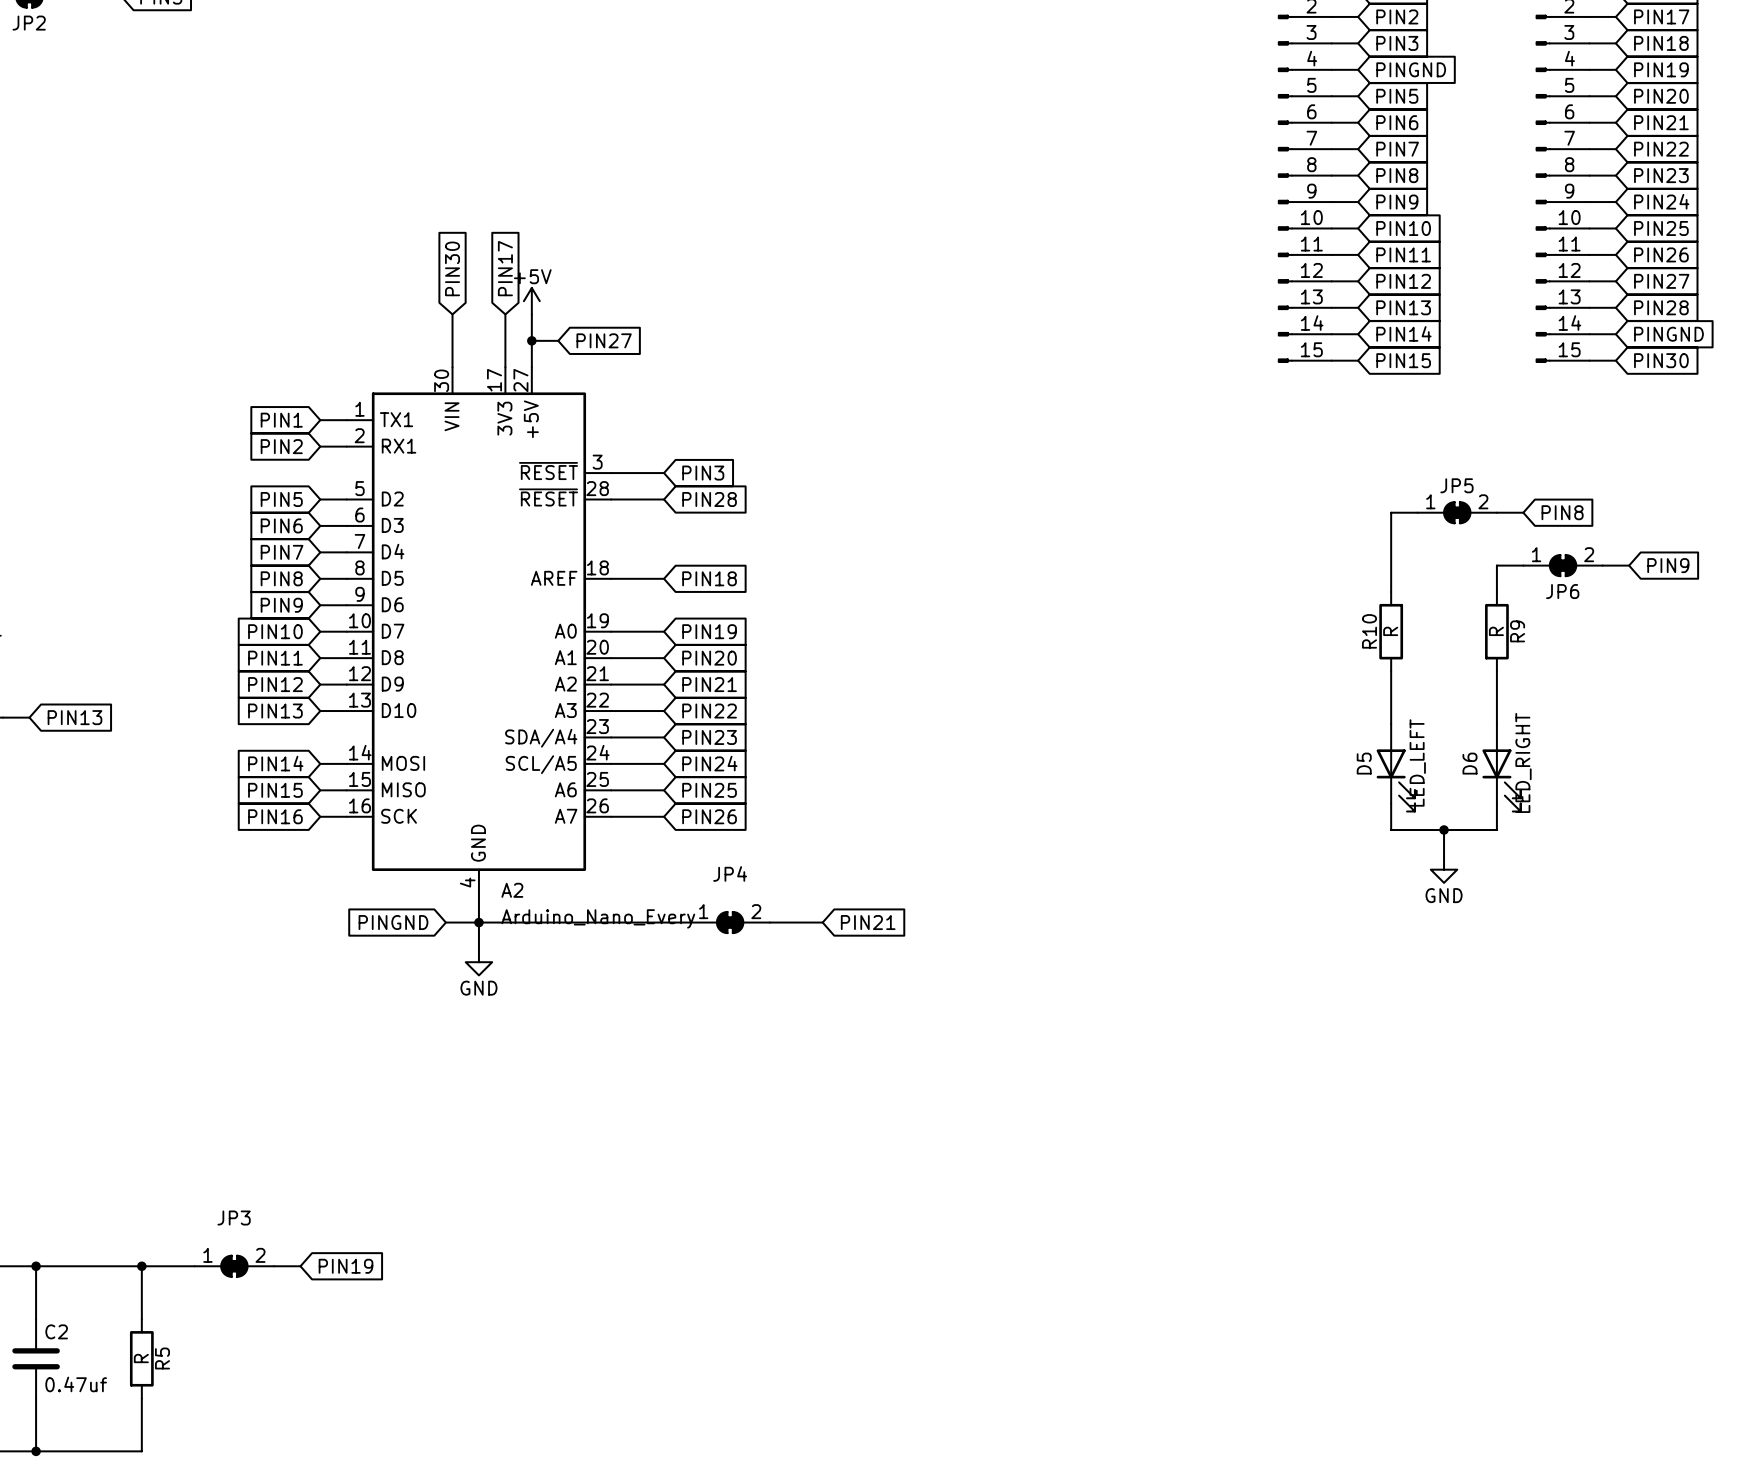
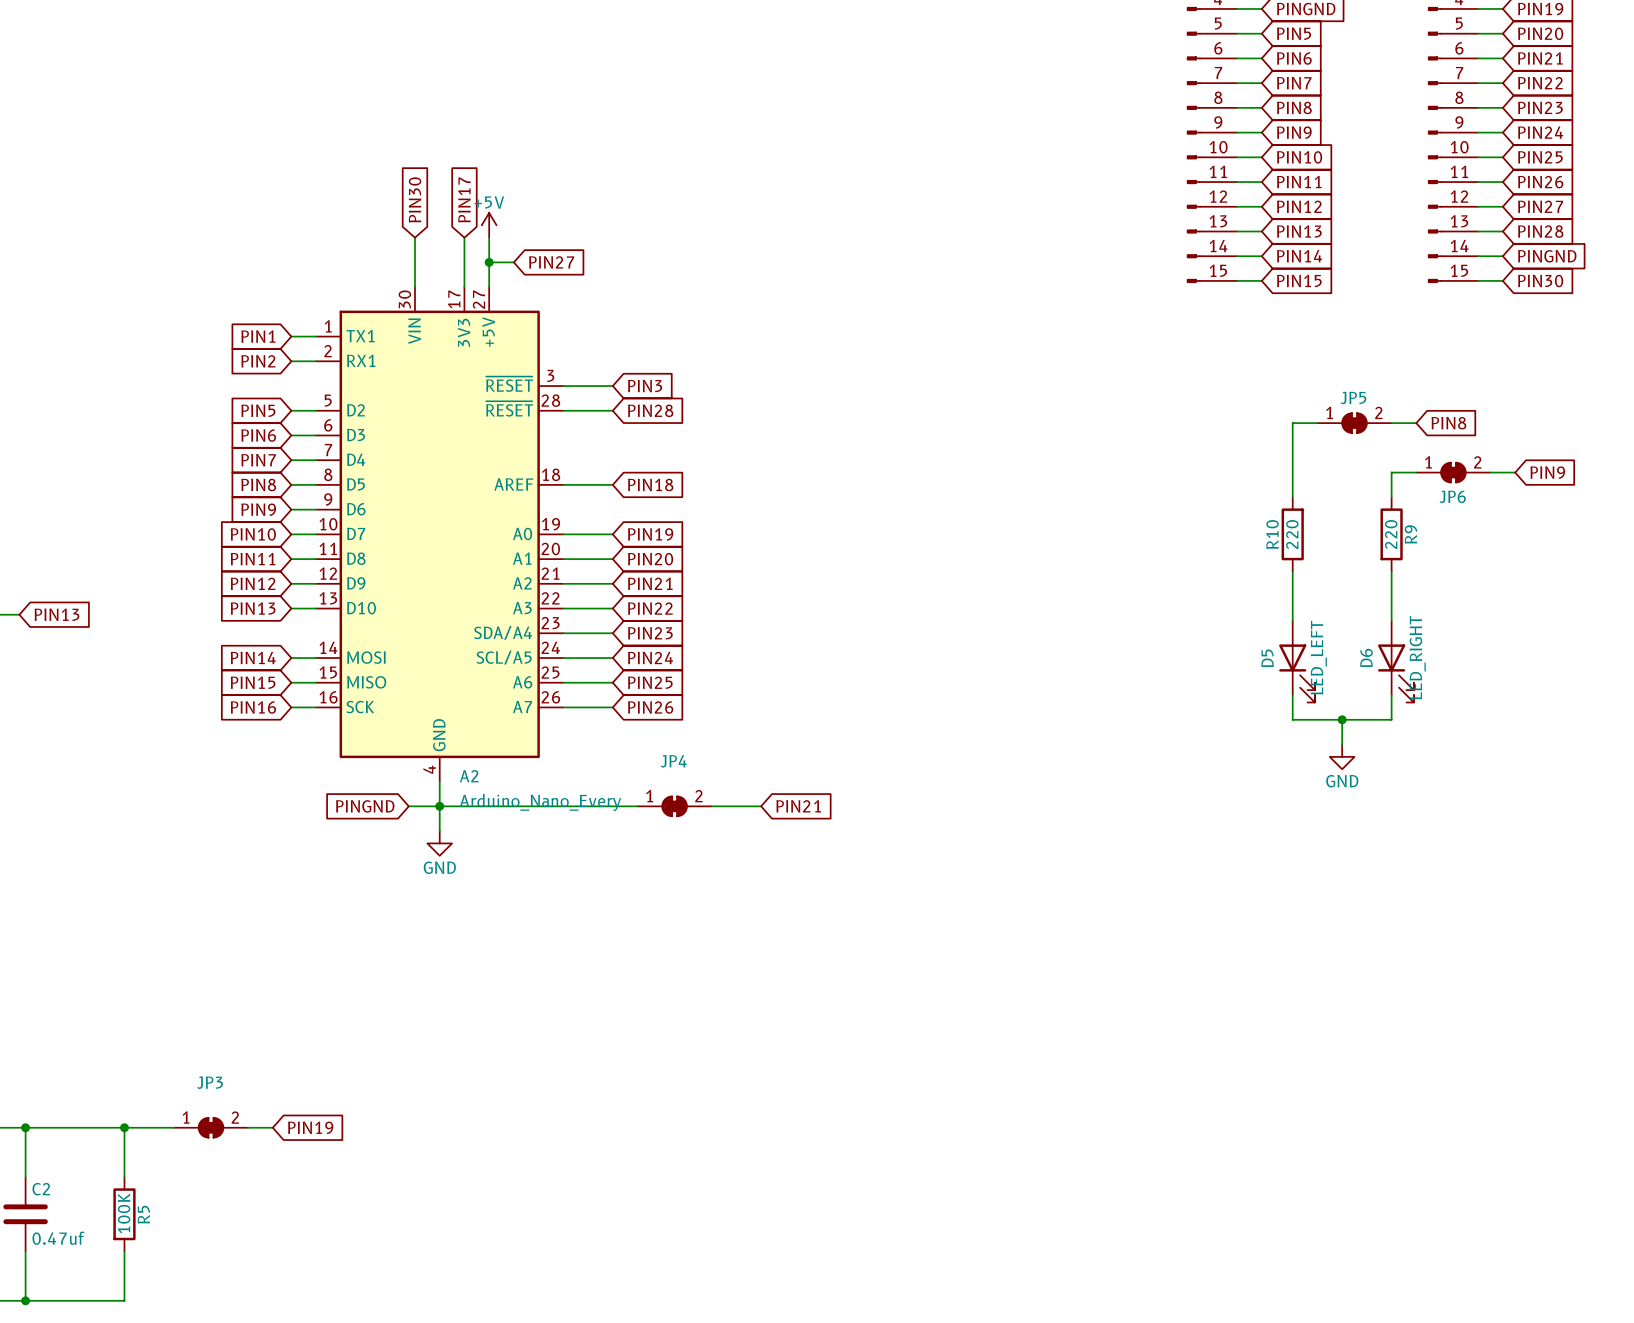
R10 value: R (1390, 631) -> 220 (1292, 534)
R9 value: R (1496, 631) -> 220 (1391, 534)
R5 value: R (141, 1358) -> 100K (124, 1213)

